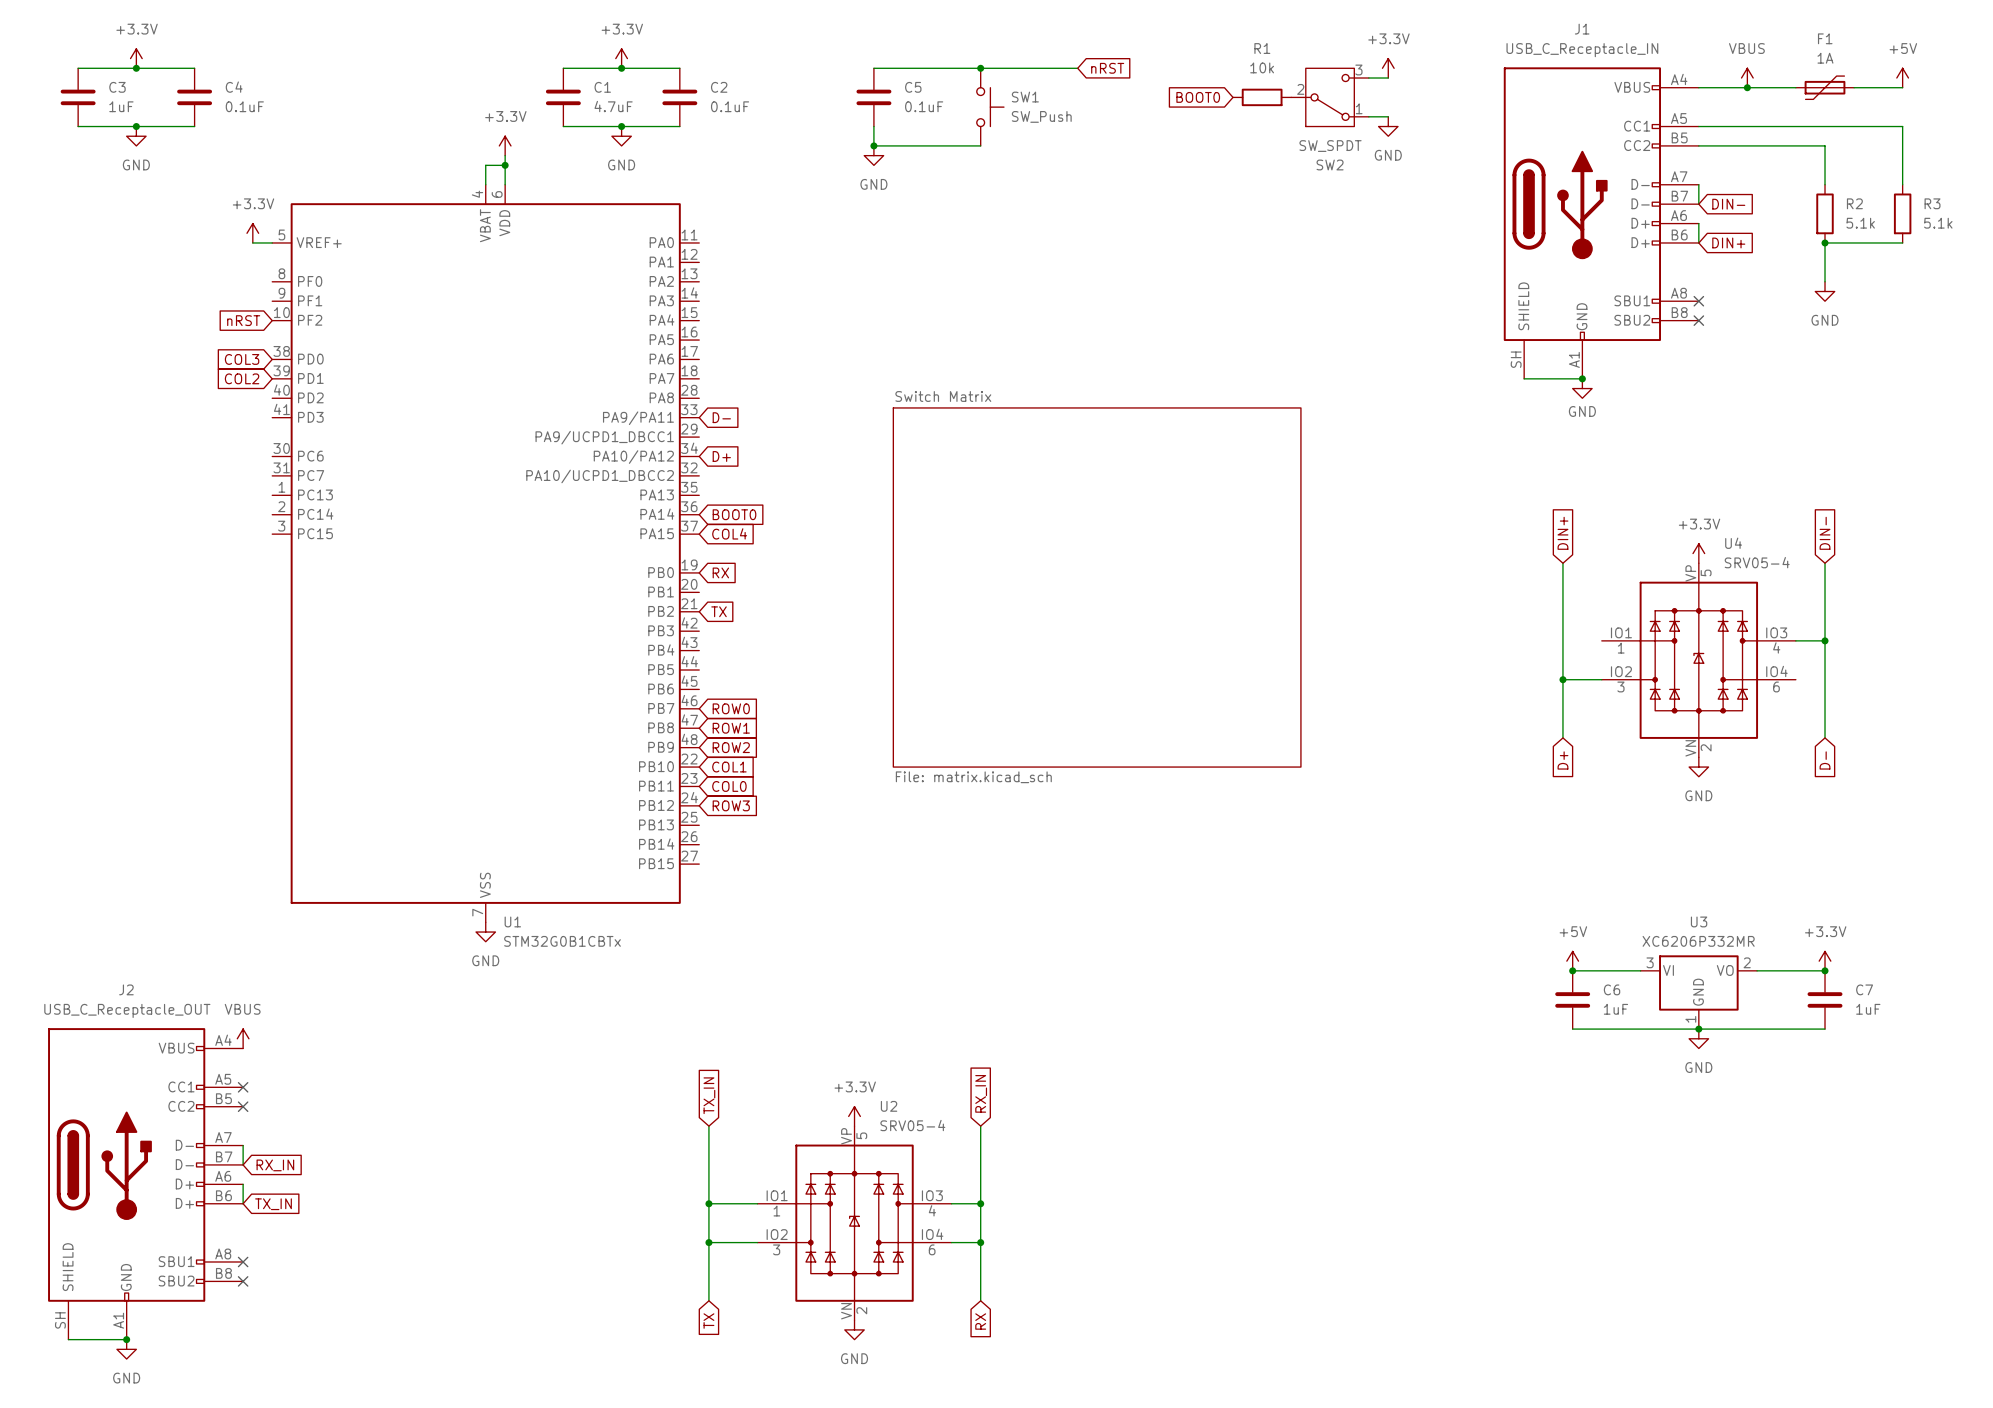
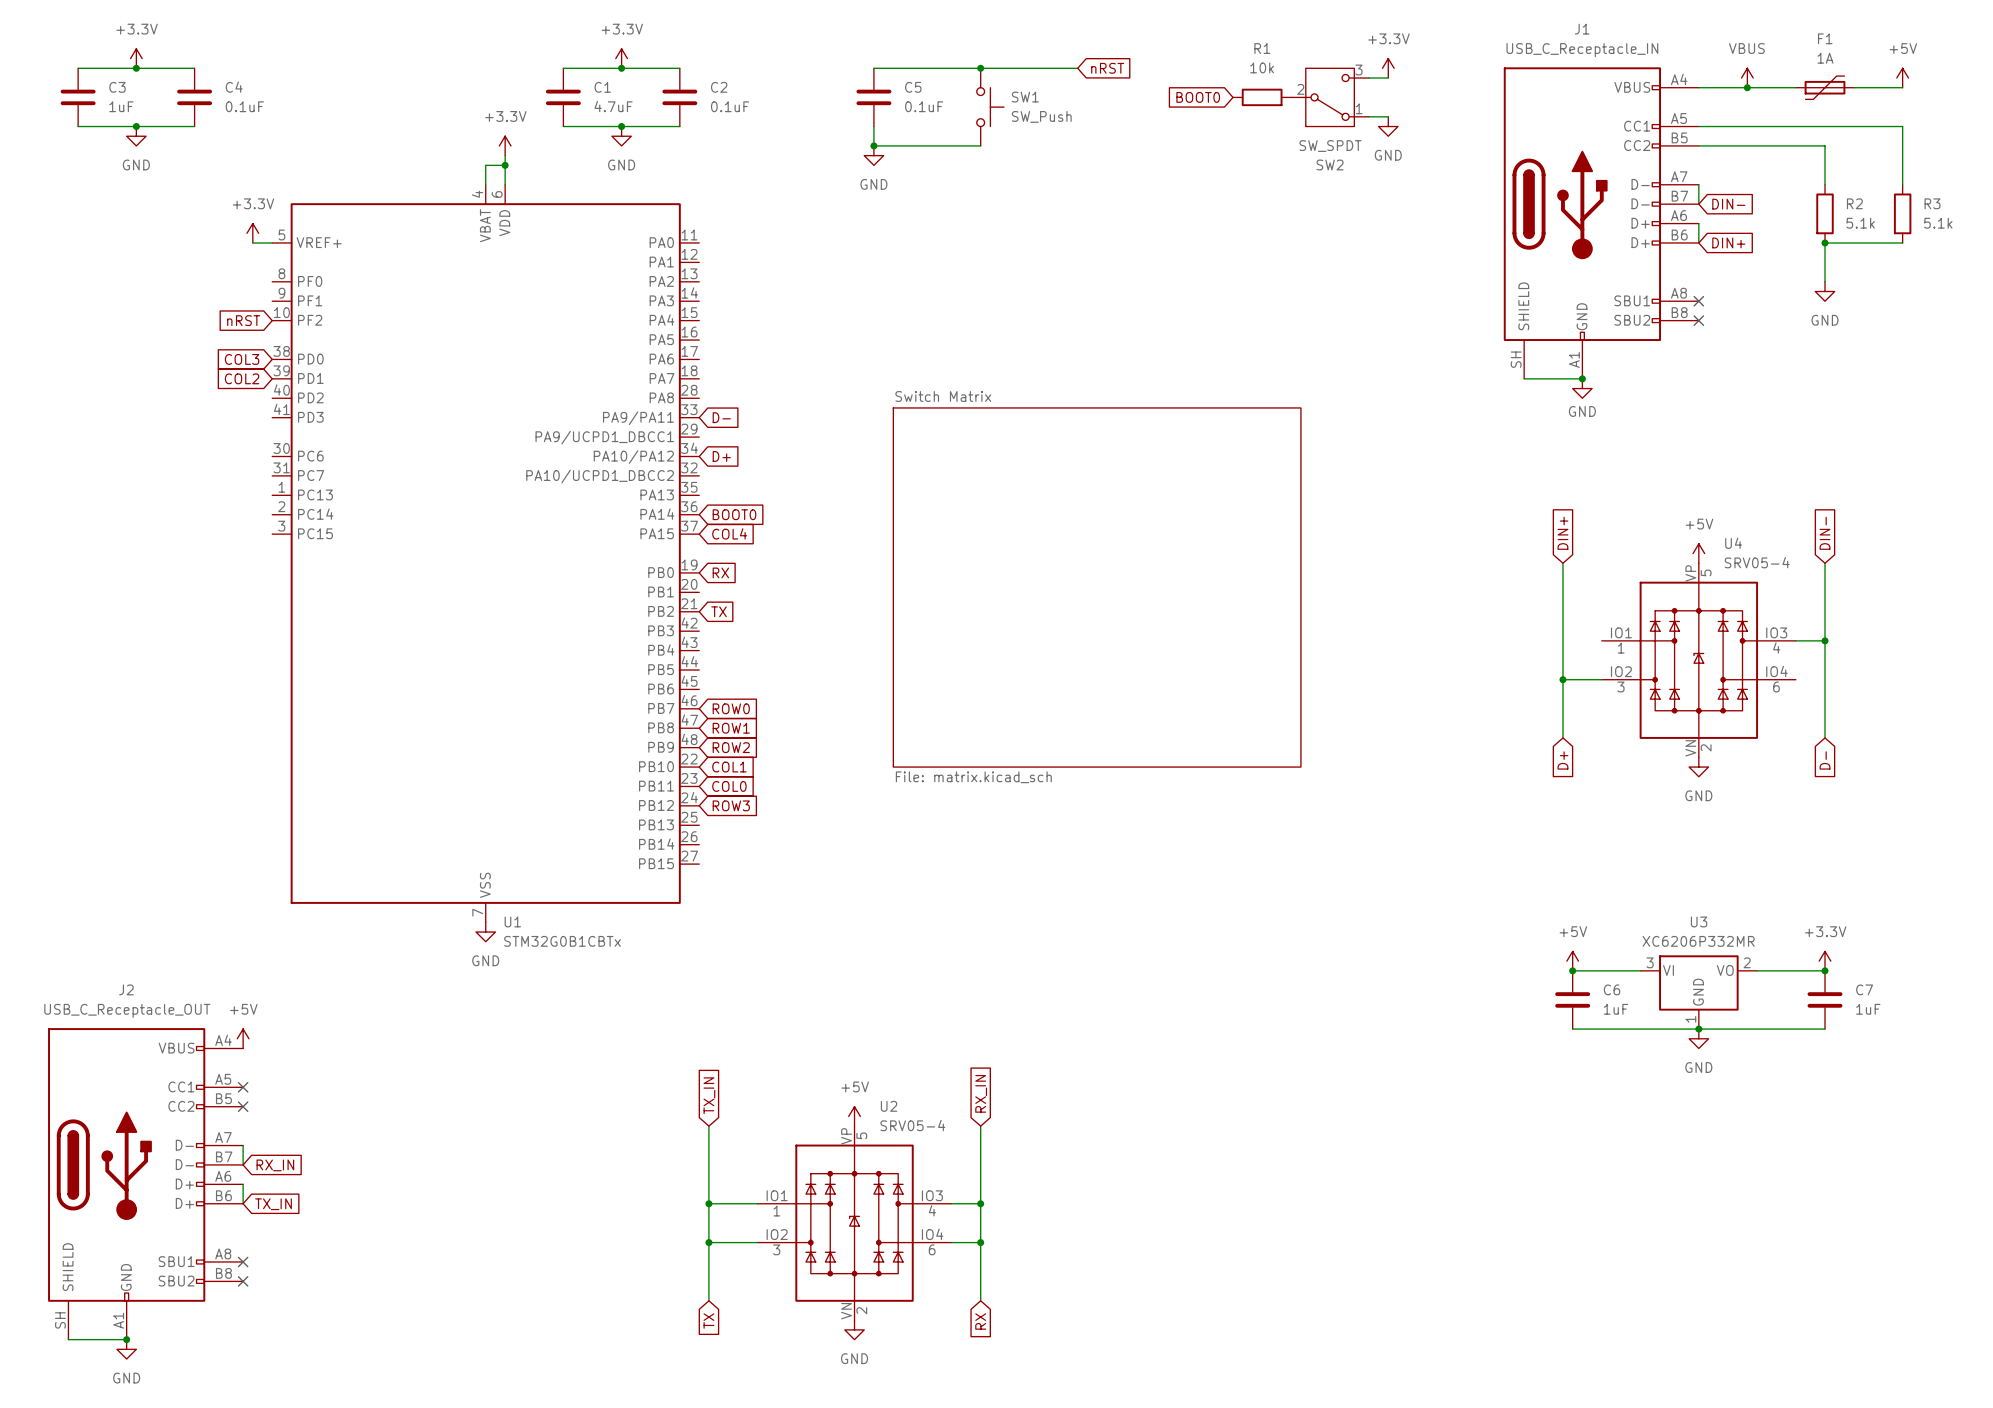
power symbol: +3.3V (1698, 553) -> +5V (1698, 553)
power symbol: VBUS (243, 1038) -> +5V (243, 1038)
power symbol: +3.3V (854, 1116) -> +5V (854, 1116)

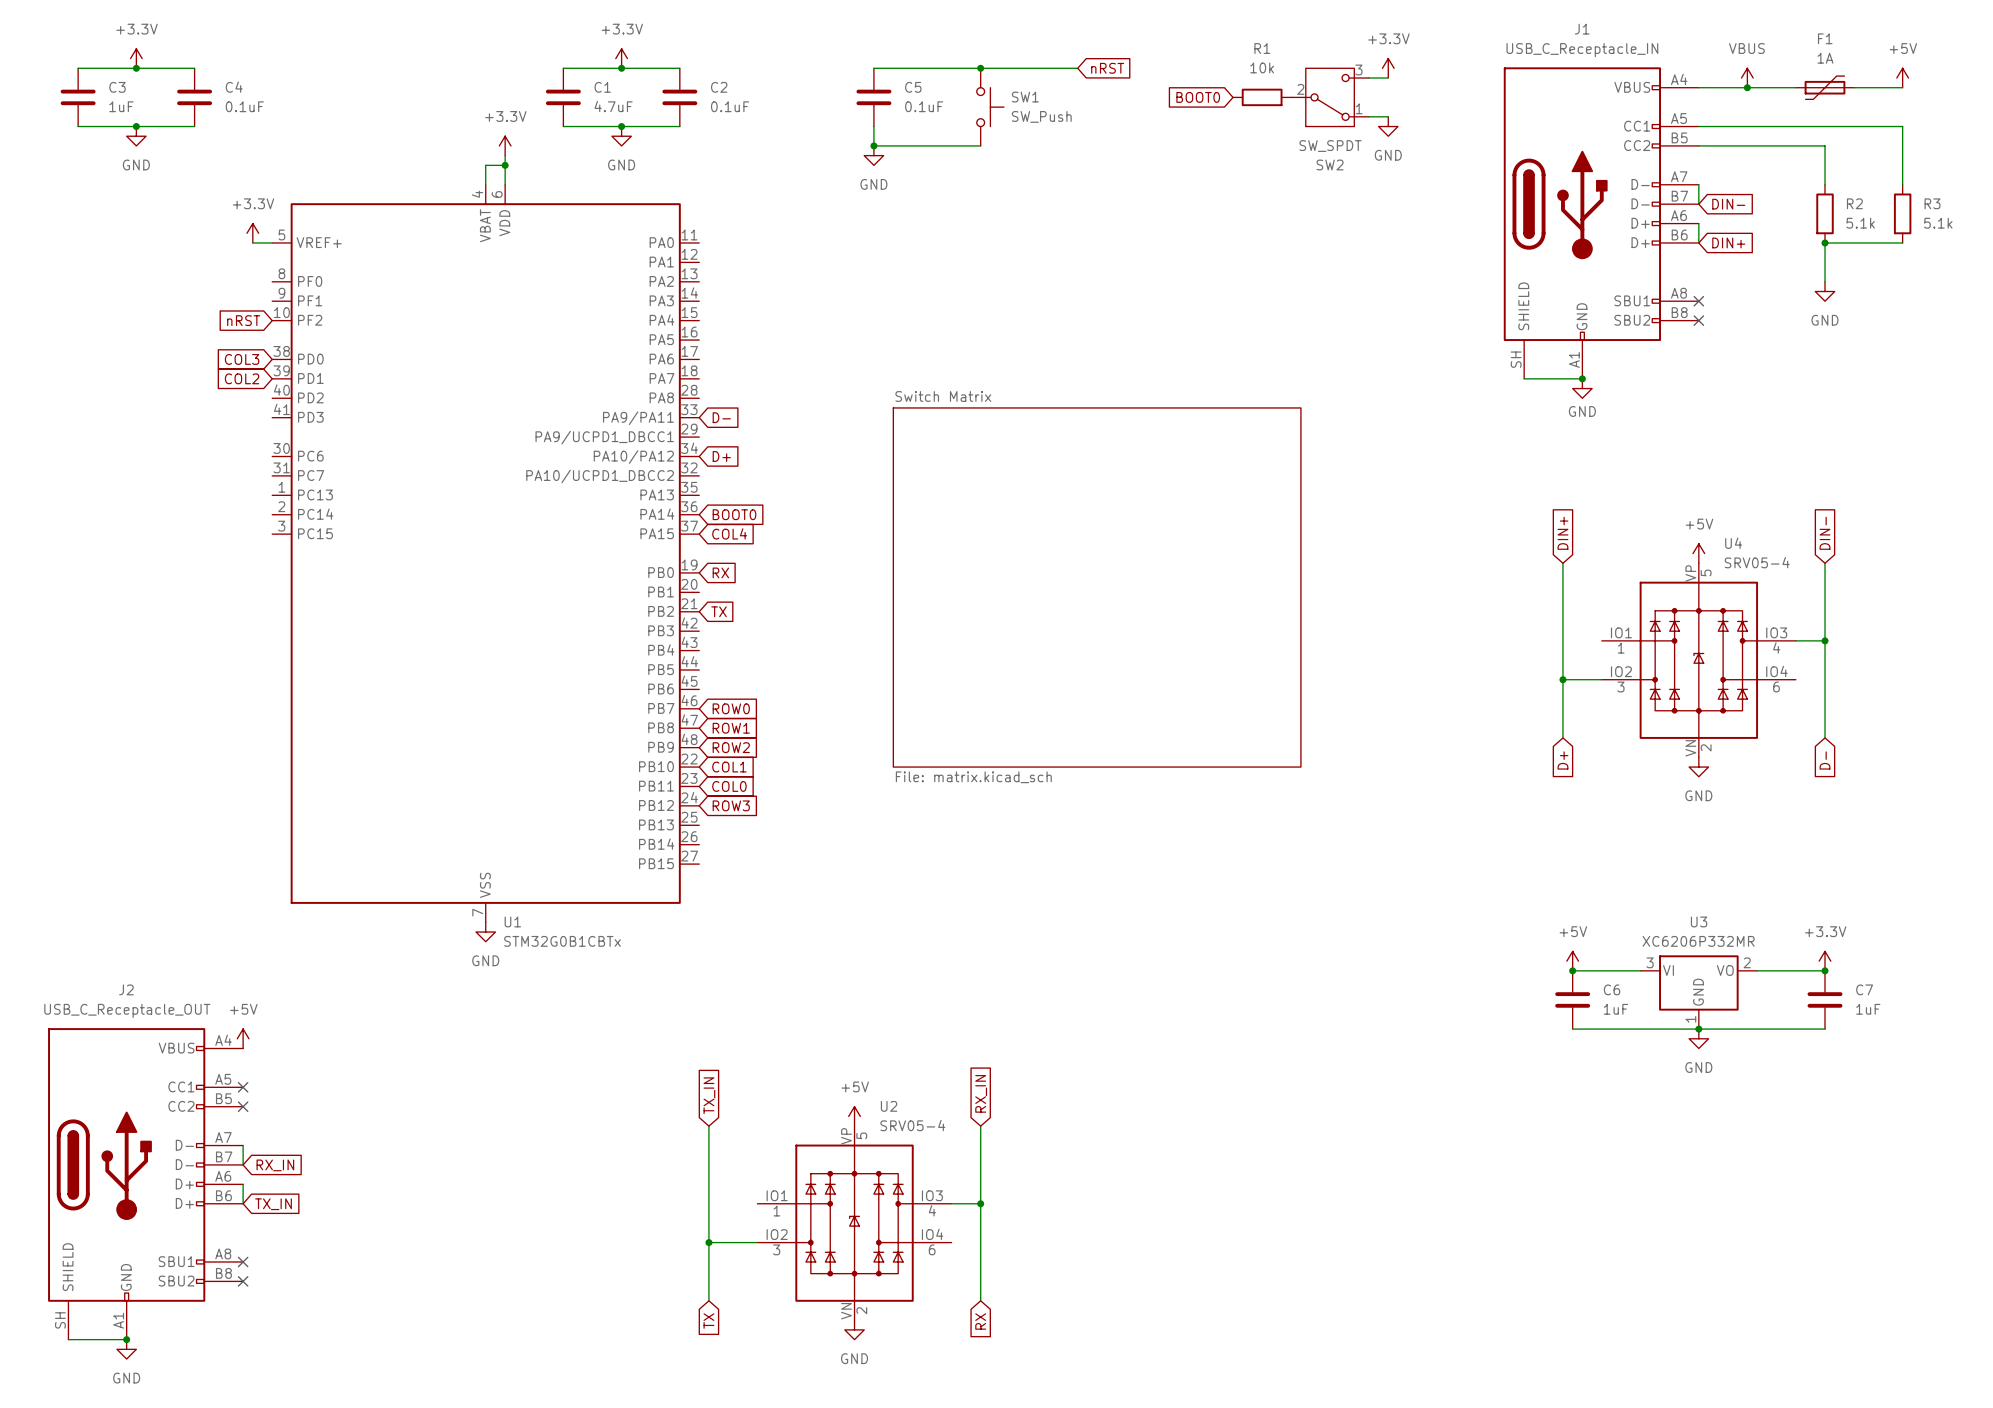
wire: (708, 1203) (757, 1203) -> none
junction: (708, 1203) -> none
wire: (951, 1242) (980, 1242) -> none
junction: (980, 1242) -> none

